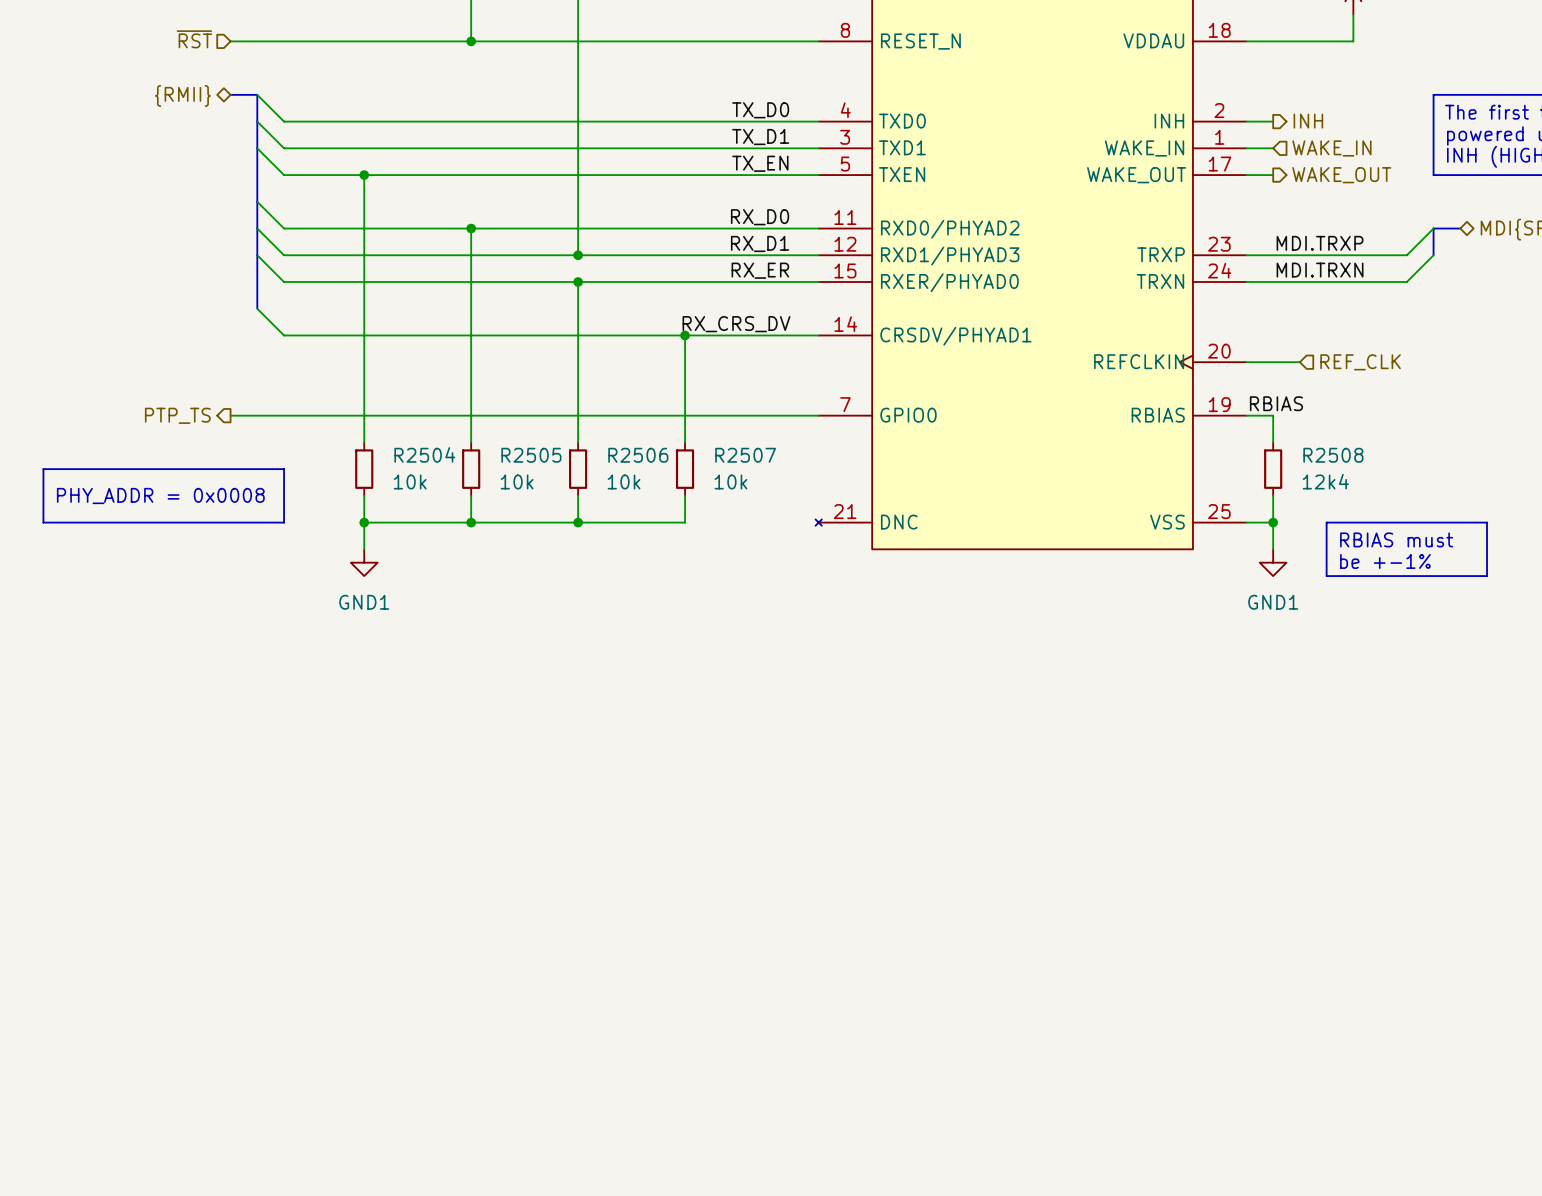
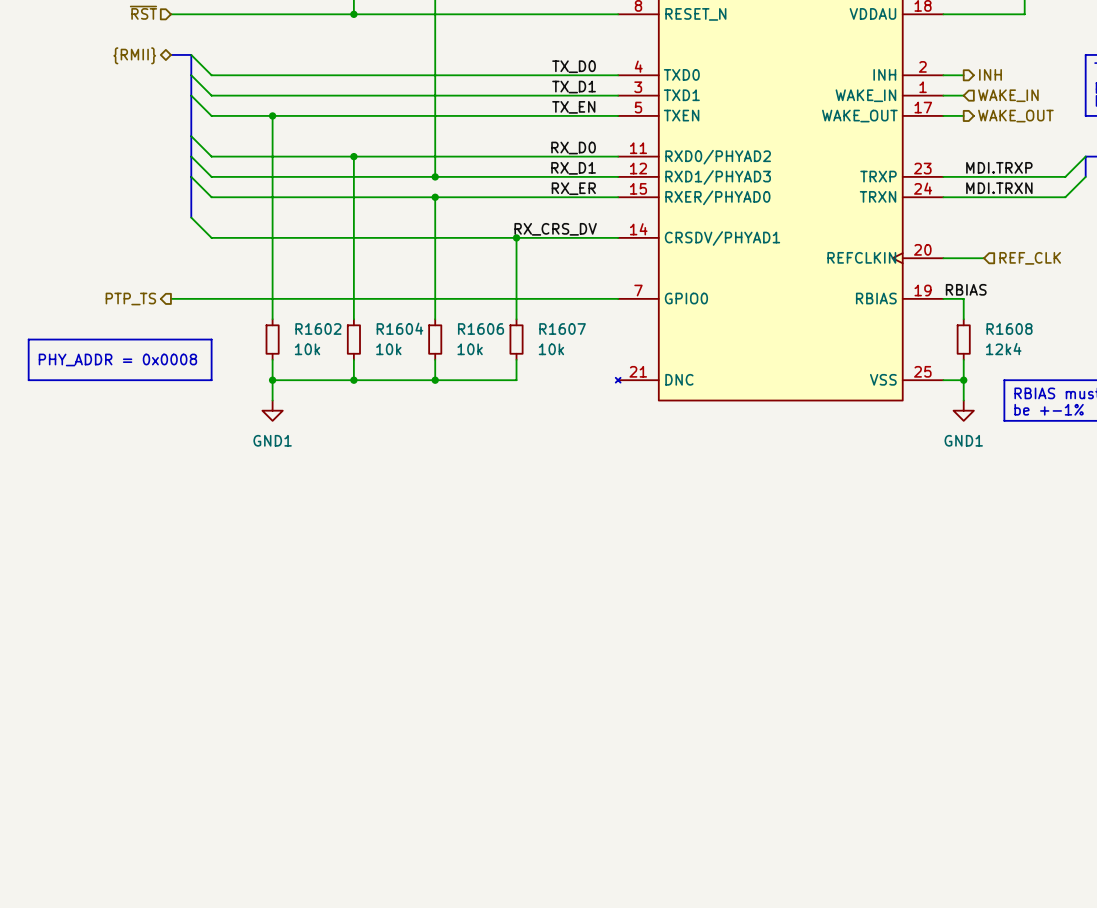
R2504 name: R2504 (424, 454) -> R1602 (318, 329)
R2505 name: R2505 (531, 455) -> R1604 (399, 328)
R2506 name: R2506 (638, 455) -> R1606 (481, 329)
R2507 name: R2507 (745, 455) -> R1607 (562, 329)
R2508 name: R2508 (1333, 455) -> R1608 (1009, 329)

